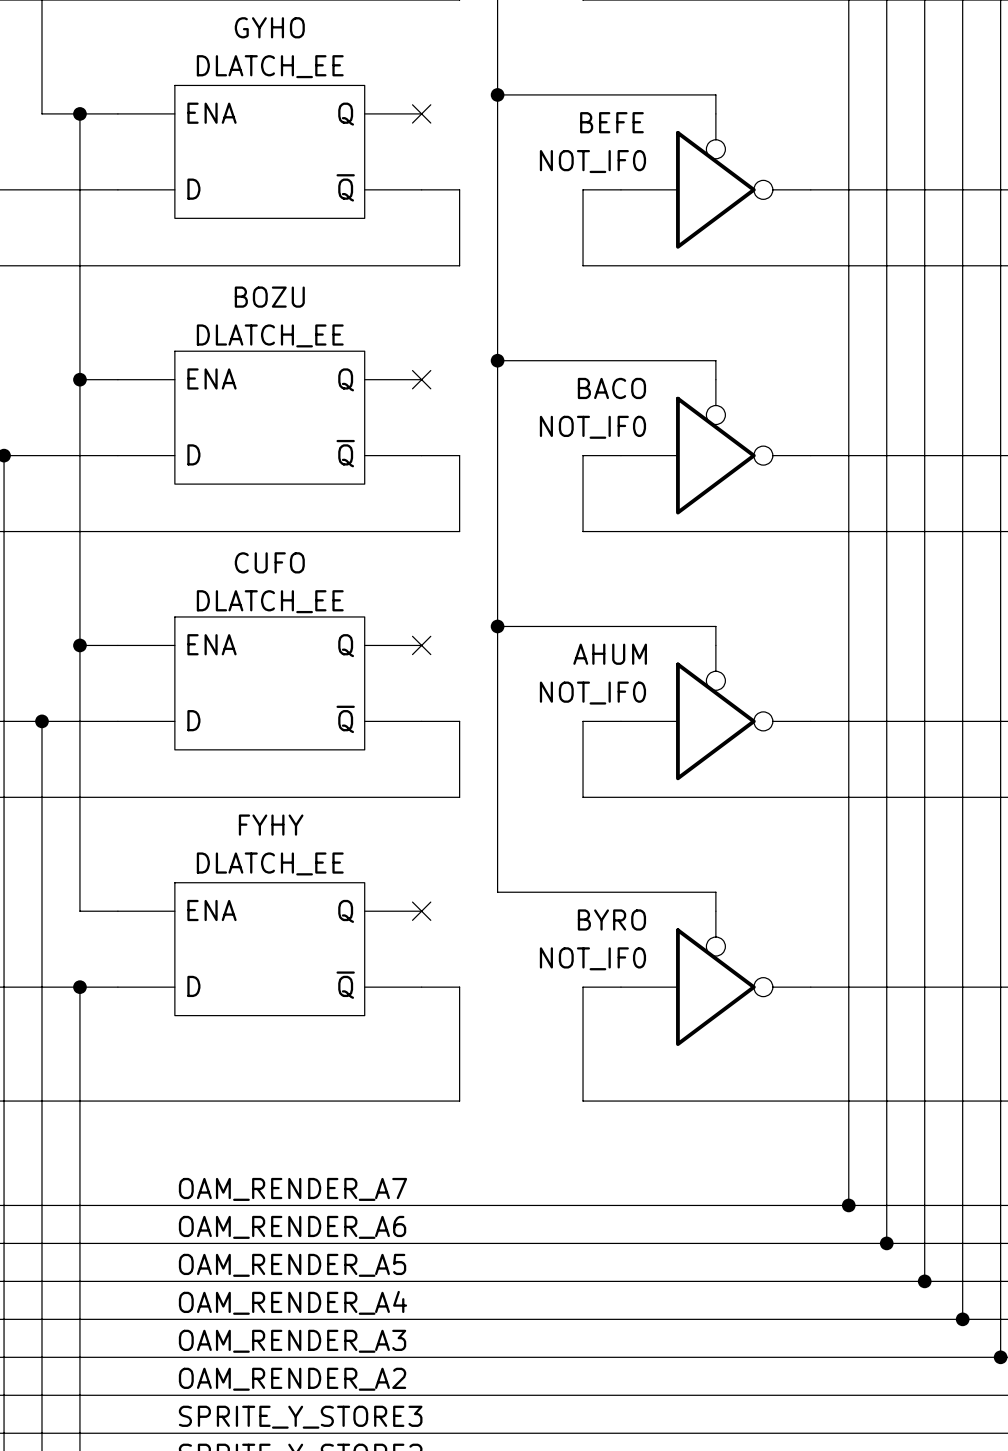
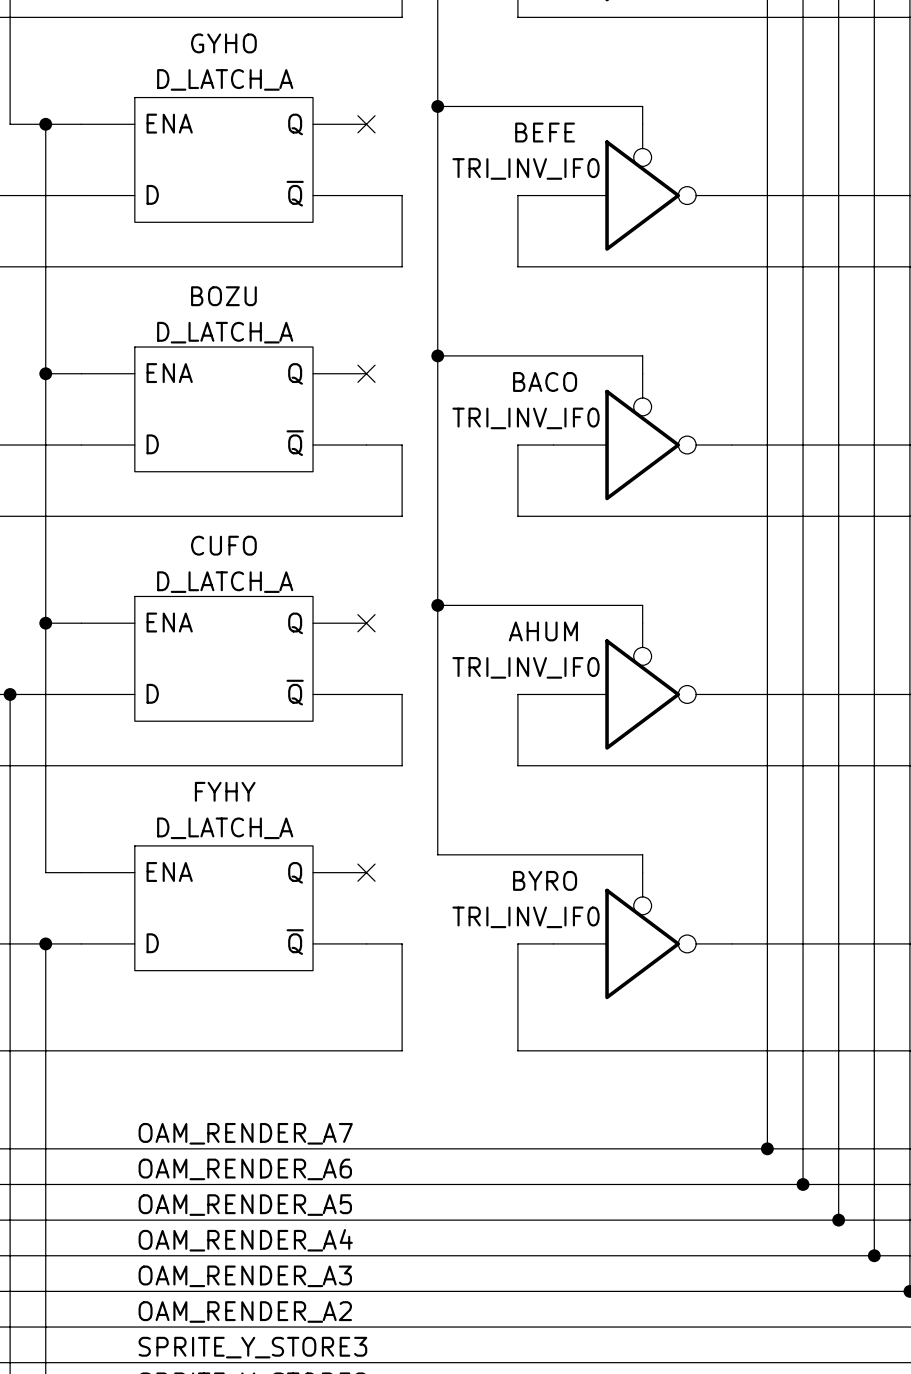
GYHO value: DLATCH_EE (270, 66) -> D_LATCH_A (225, 79)
BEFE value: NOT_IF0 (592, 161) -> TRI_INV_IF0 (525, 168)
BOZU value: DLATCH_EE (270, 335) -> D_LATCH_A (225, 332)
BACO value: NOT_IF0 (592, 427) -> TRI_INV_IF0 (525, 418)
CUFO value: DLATCH_EE (270, 601) -> D_LATCH_A (225, 582)
AHUM value: NOT_IF0 (592, 693) -> TRI_INV_IF0 (525, 667)
FYHY value: DLATCH_EE (270, 863) -> D_LATCH_A (225, 828)
BYRO value: NOT_IF0 (592, 958) -> TRI_INV_IF0 (525, 917)

